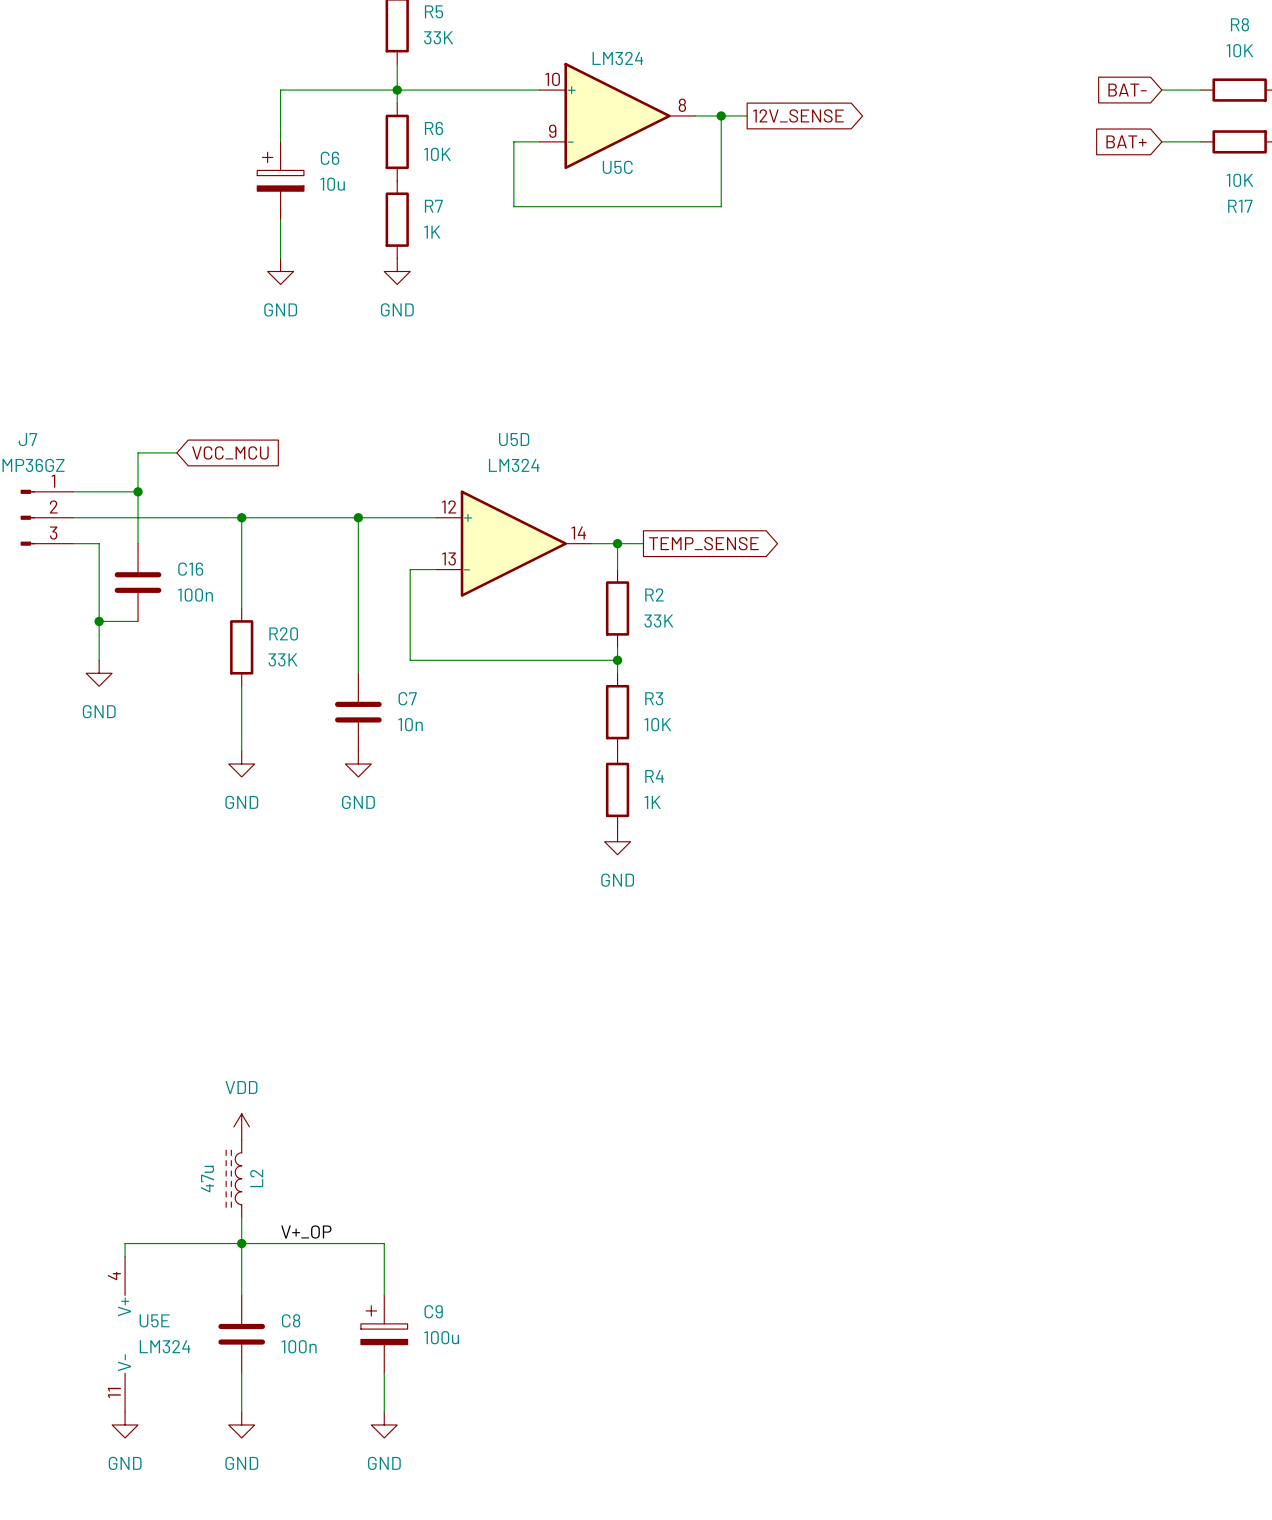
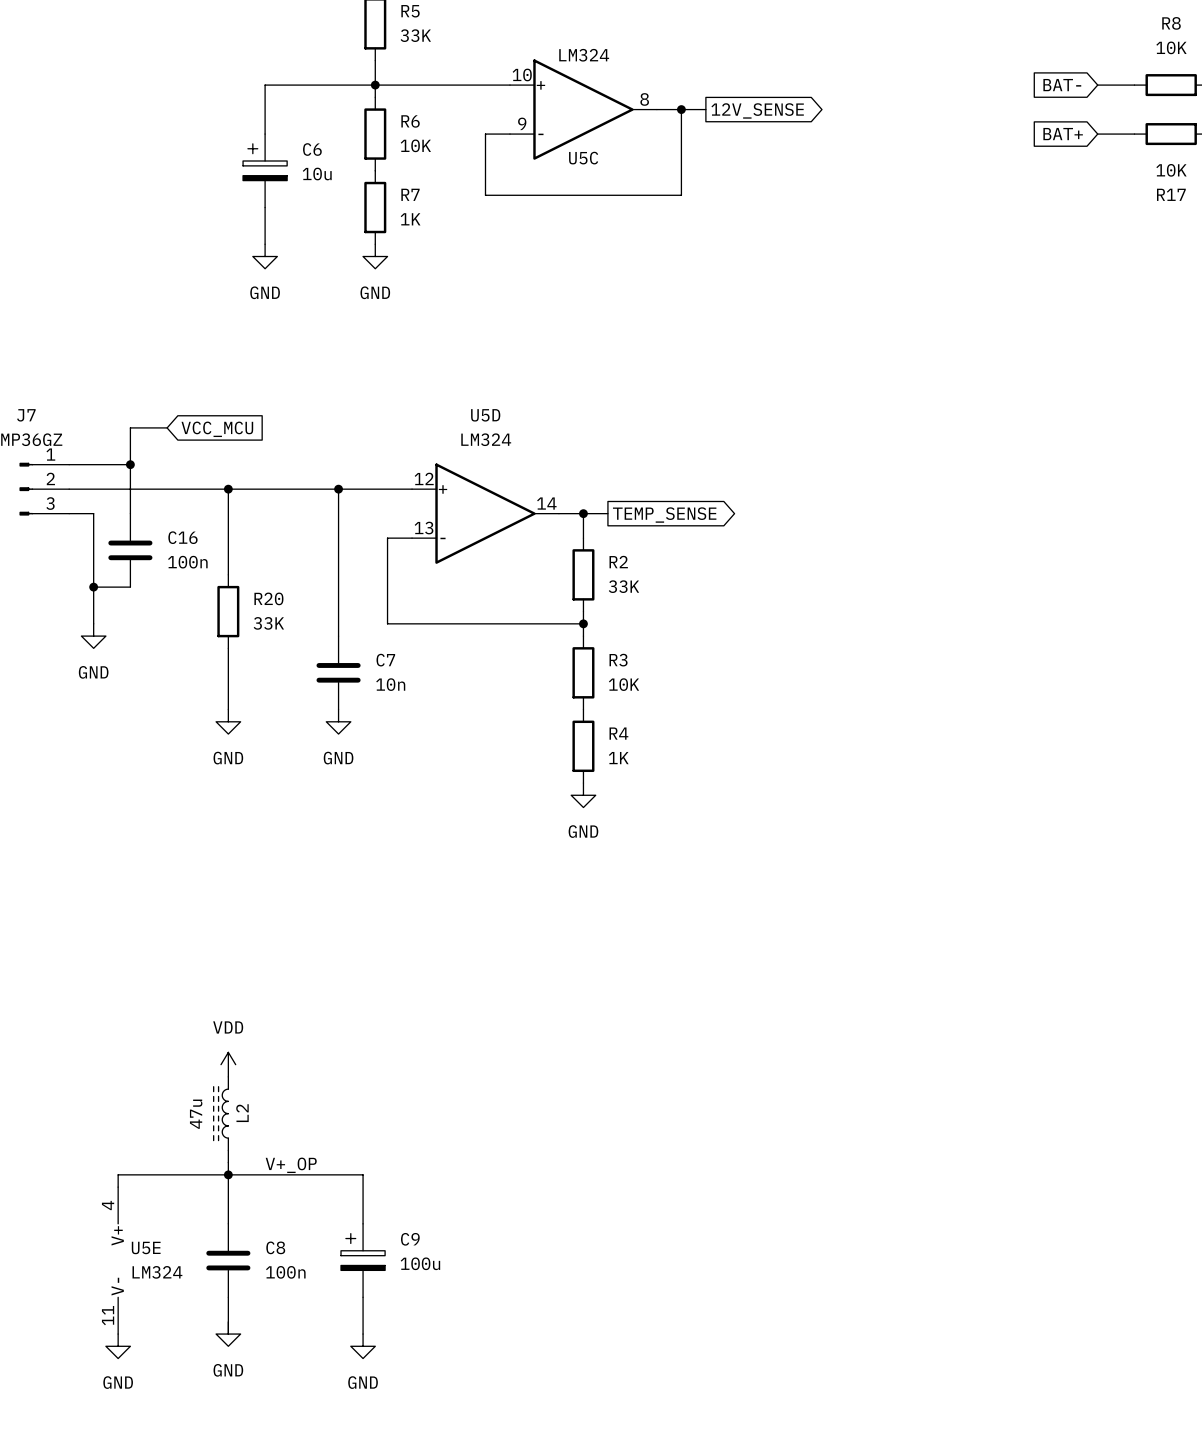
power symbol position: GND (241, 1424) -> GND (228, 1334)

